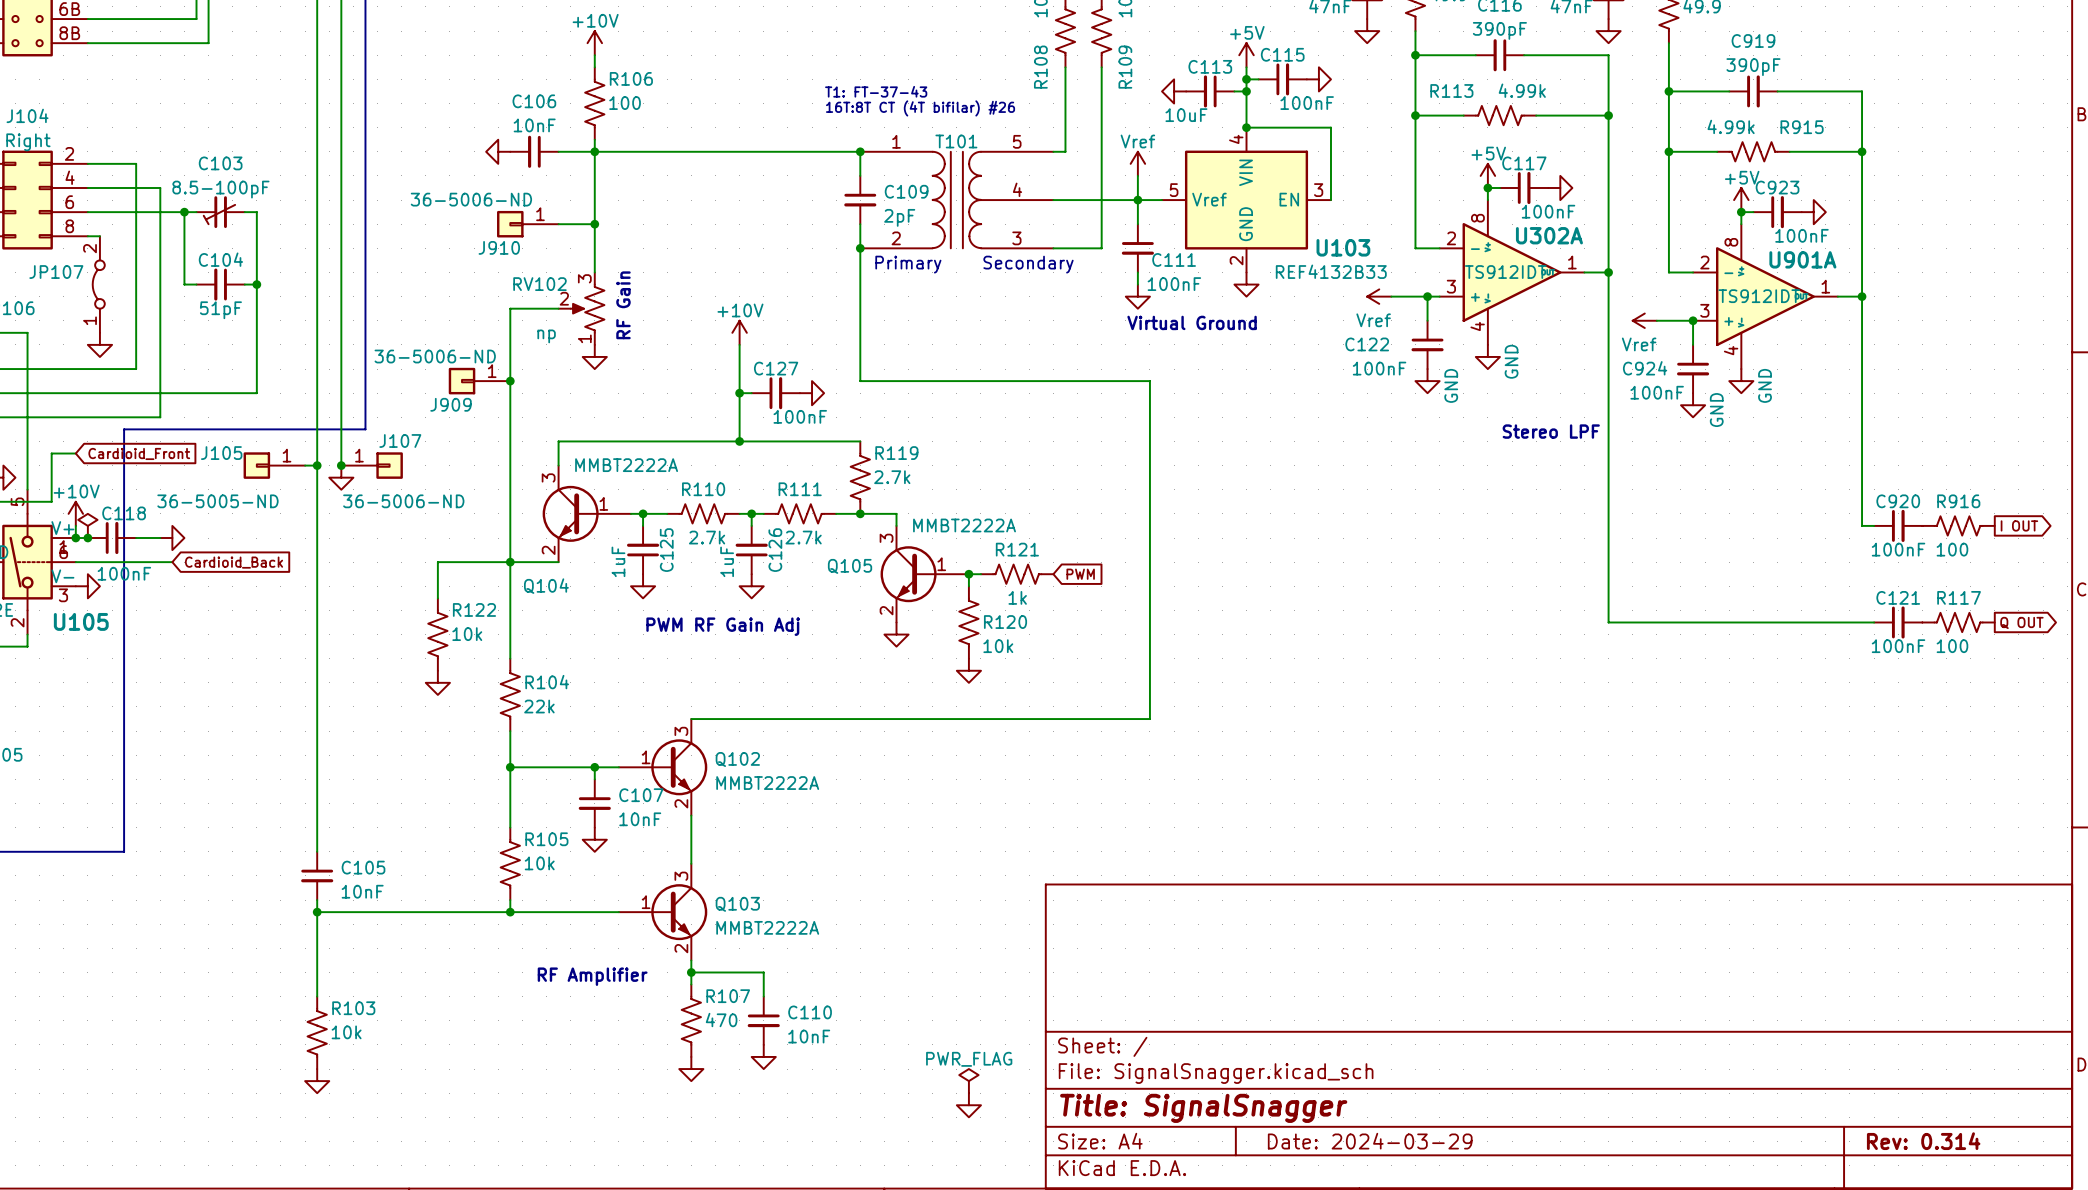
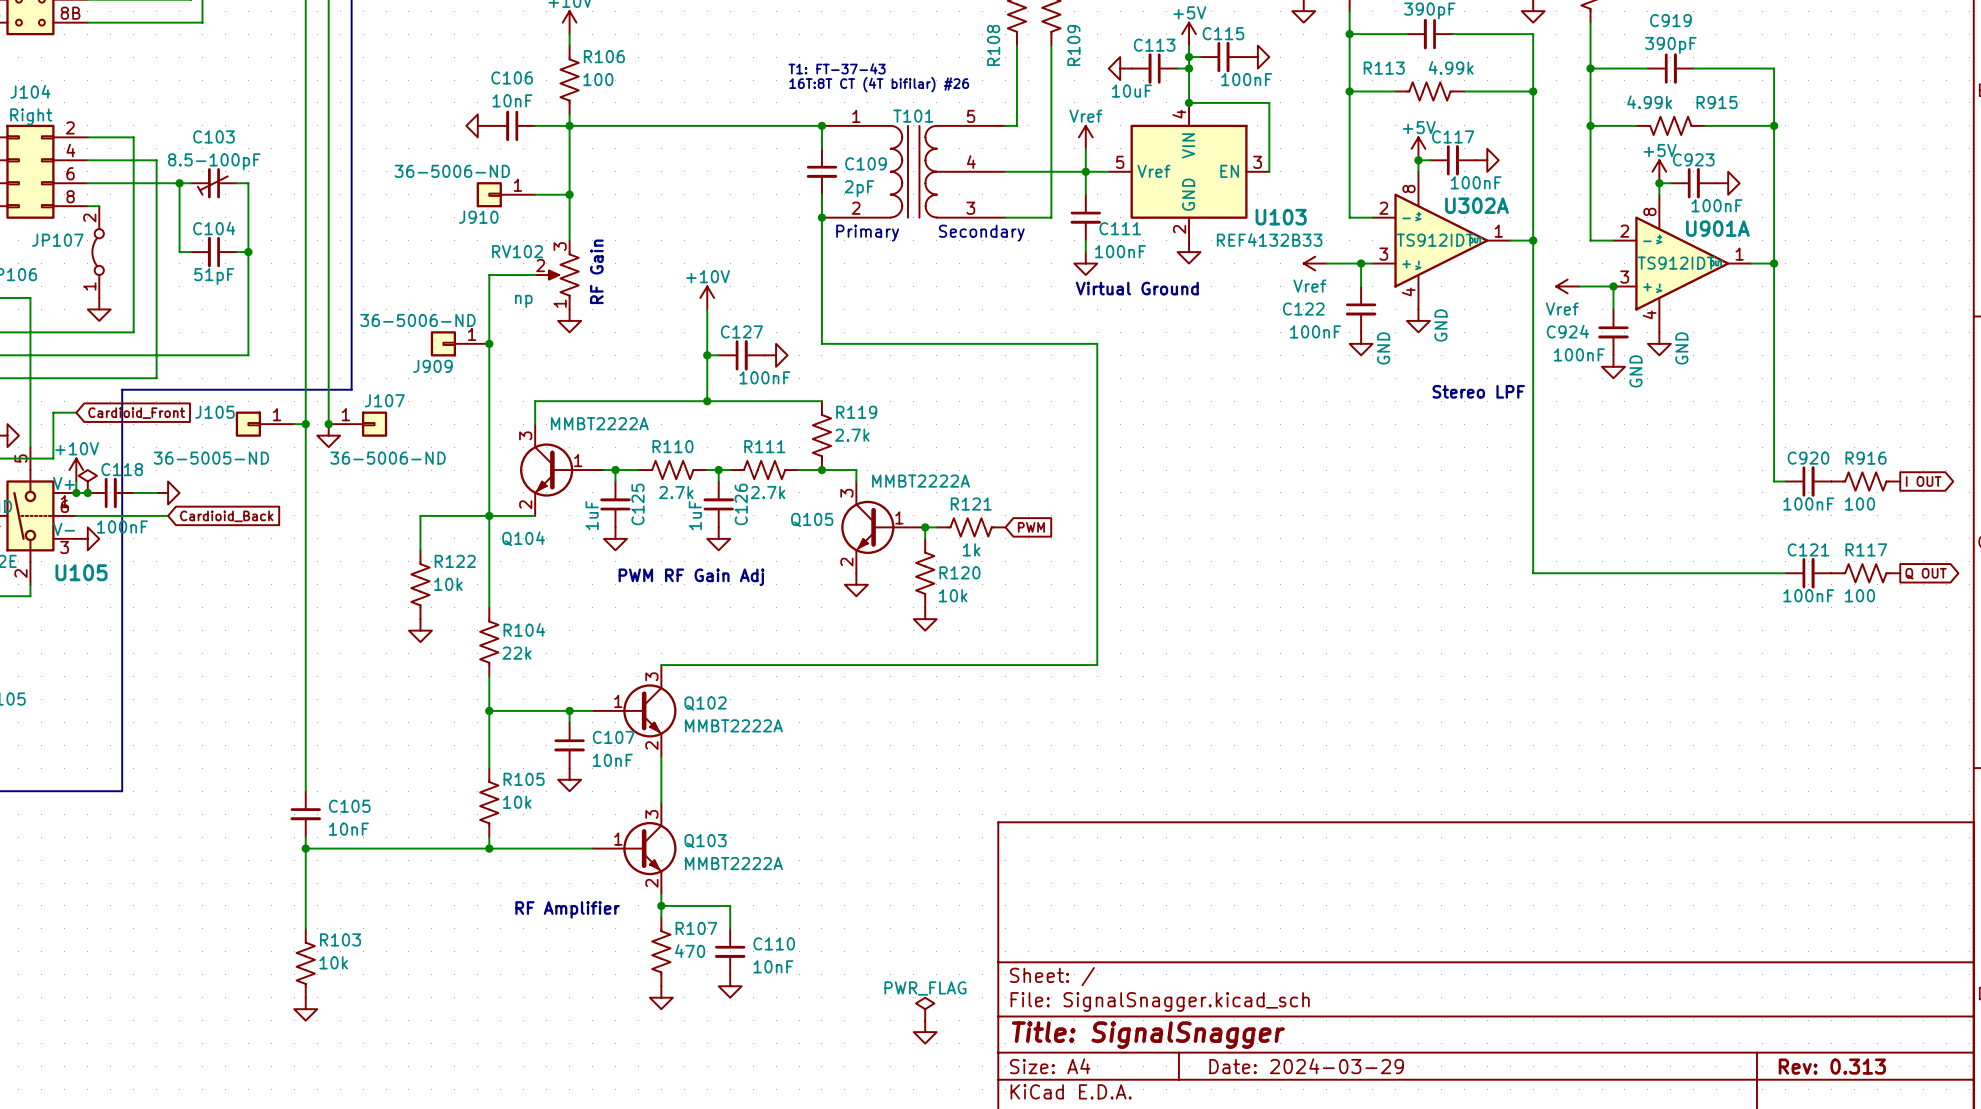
title block: Rev: 0.314 (1923, 1141) -> Rev: 0.313 (1832, 1066)

